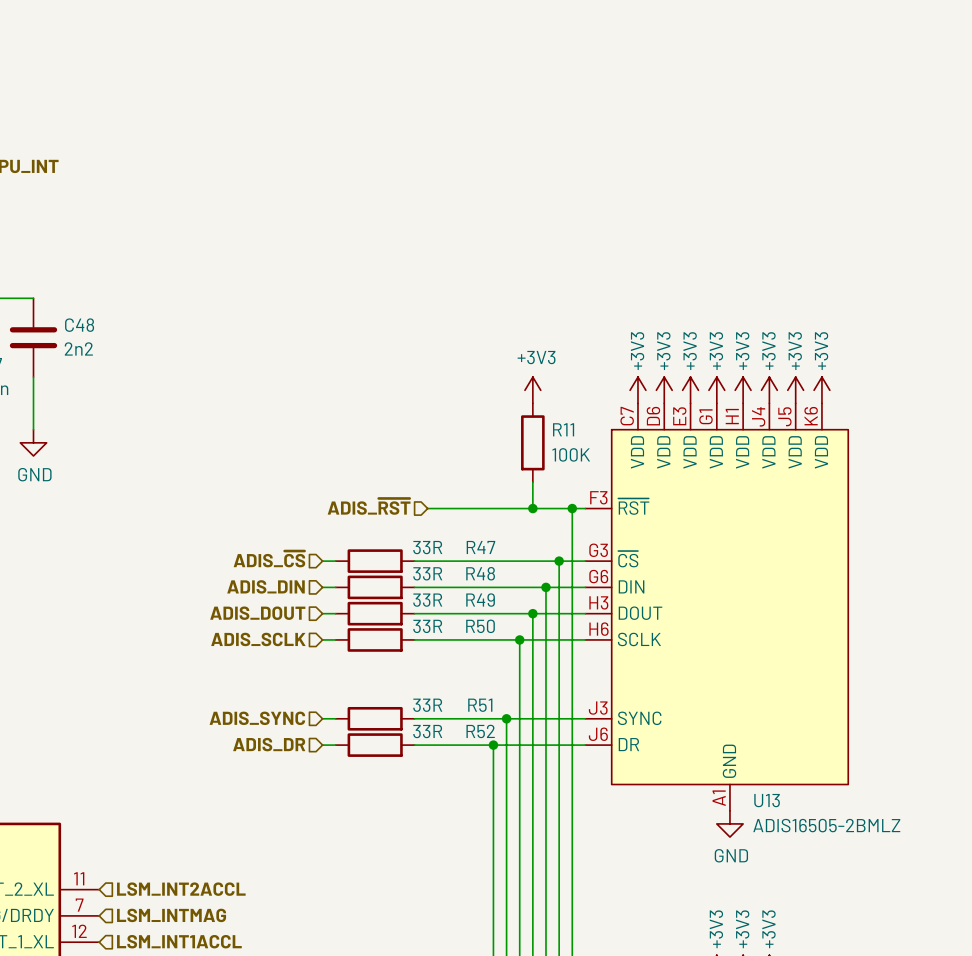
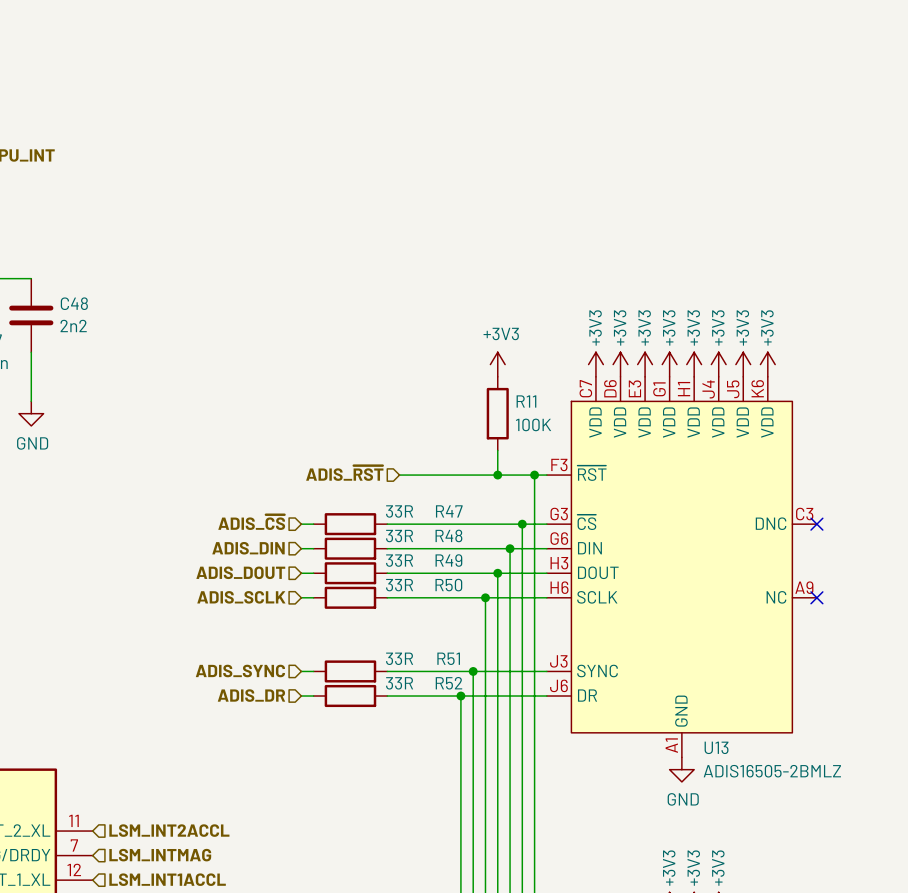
U13 symbol: [585, 403, 849, 811] -> [546, 376, 817, 758]
no-connect mark: none -> (816, 524)
no-connect mark: none -> (816, 597)

